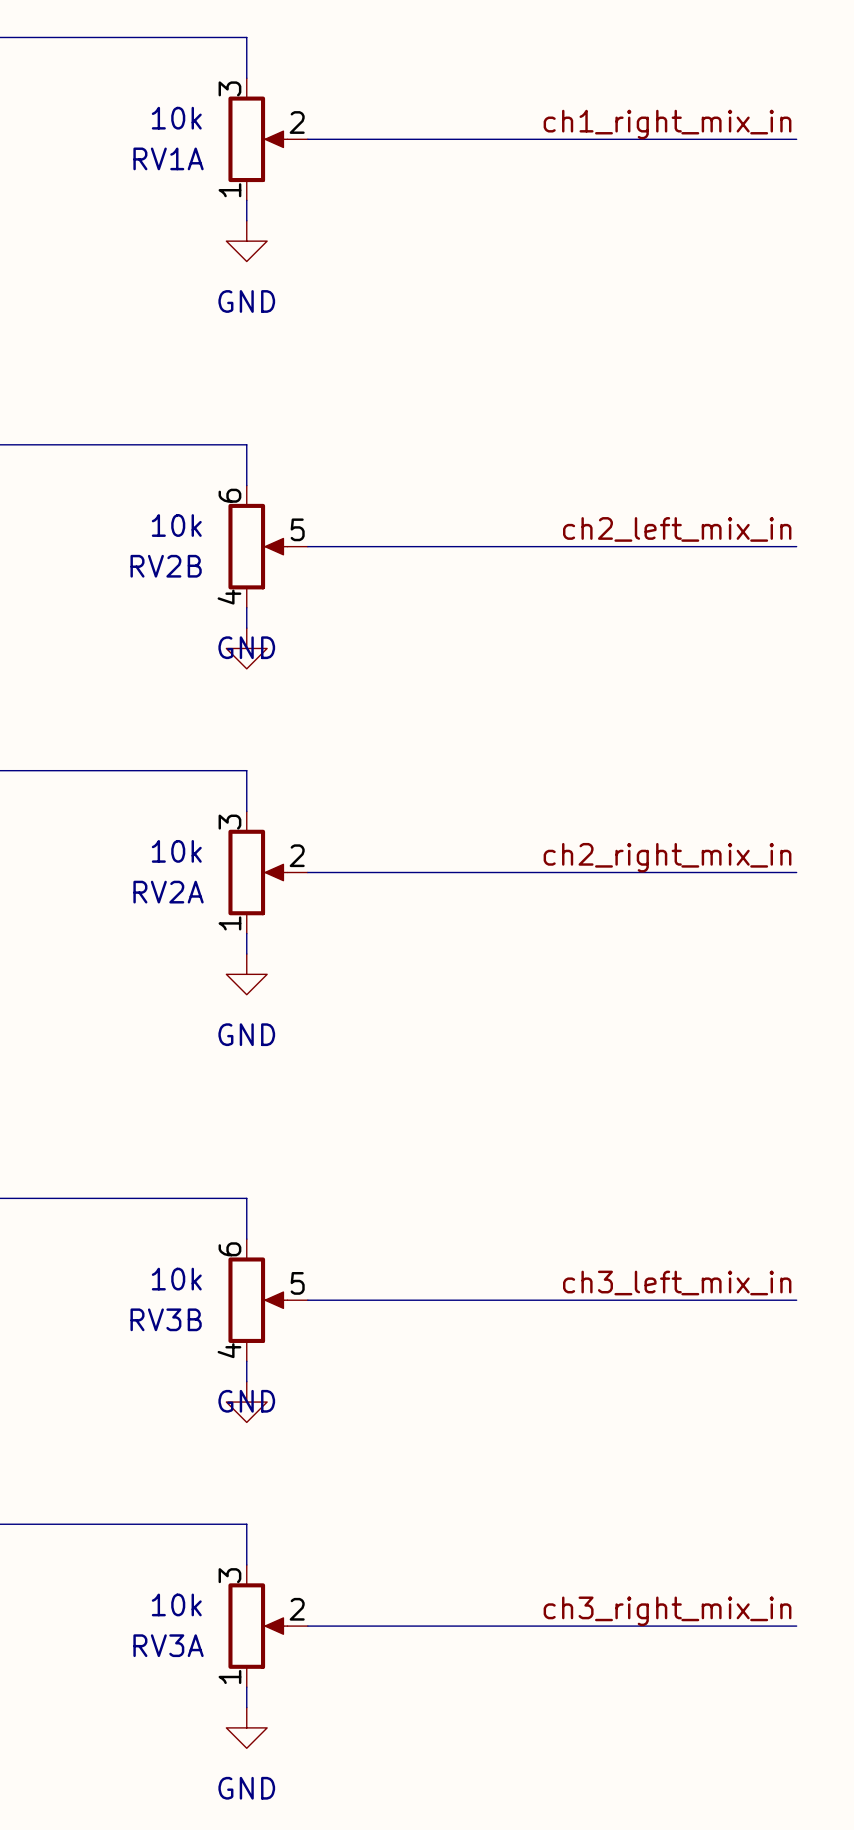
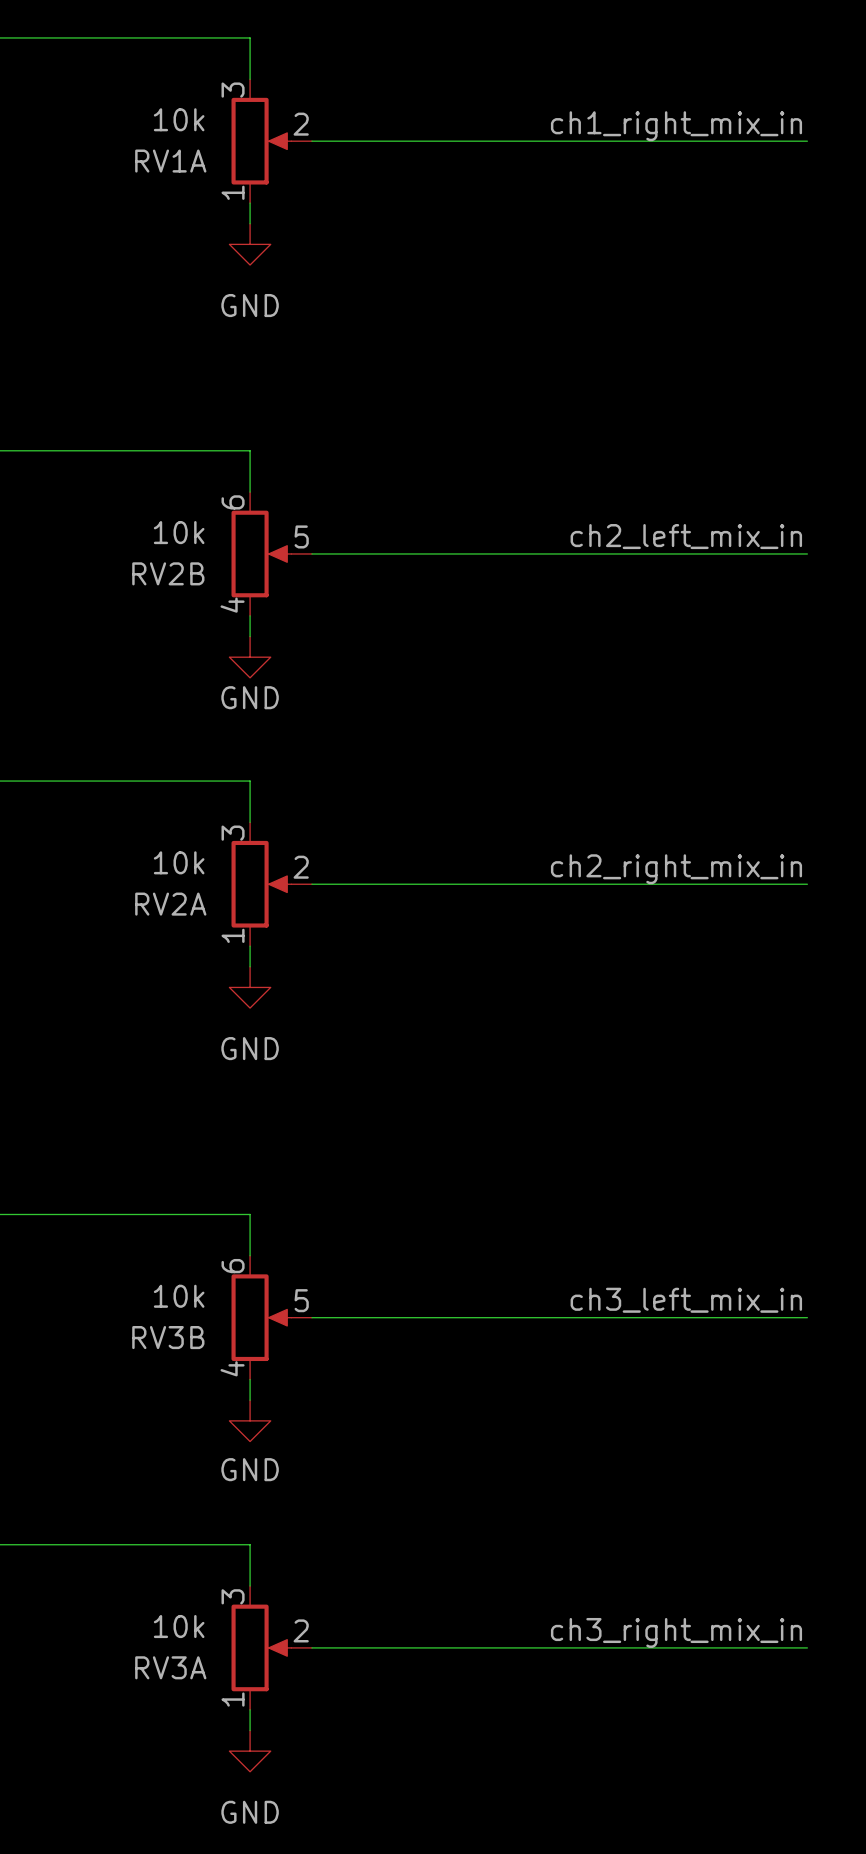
power symbol text position: GND (246, 647) -> GND (250, 697)
power symbol text position: GND (246, 1401) -> GND (250, 1469)

